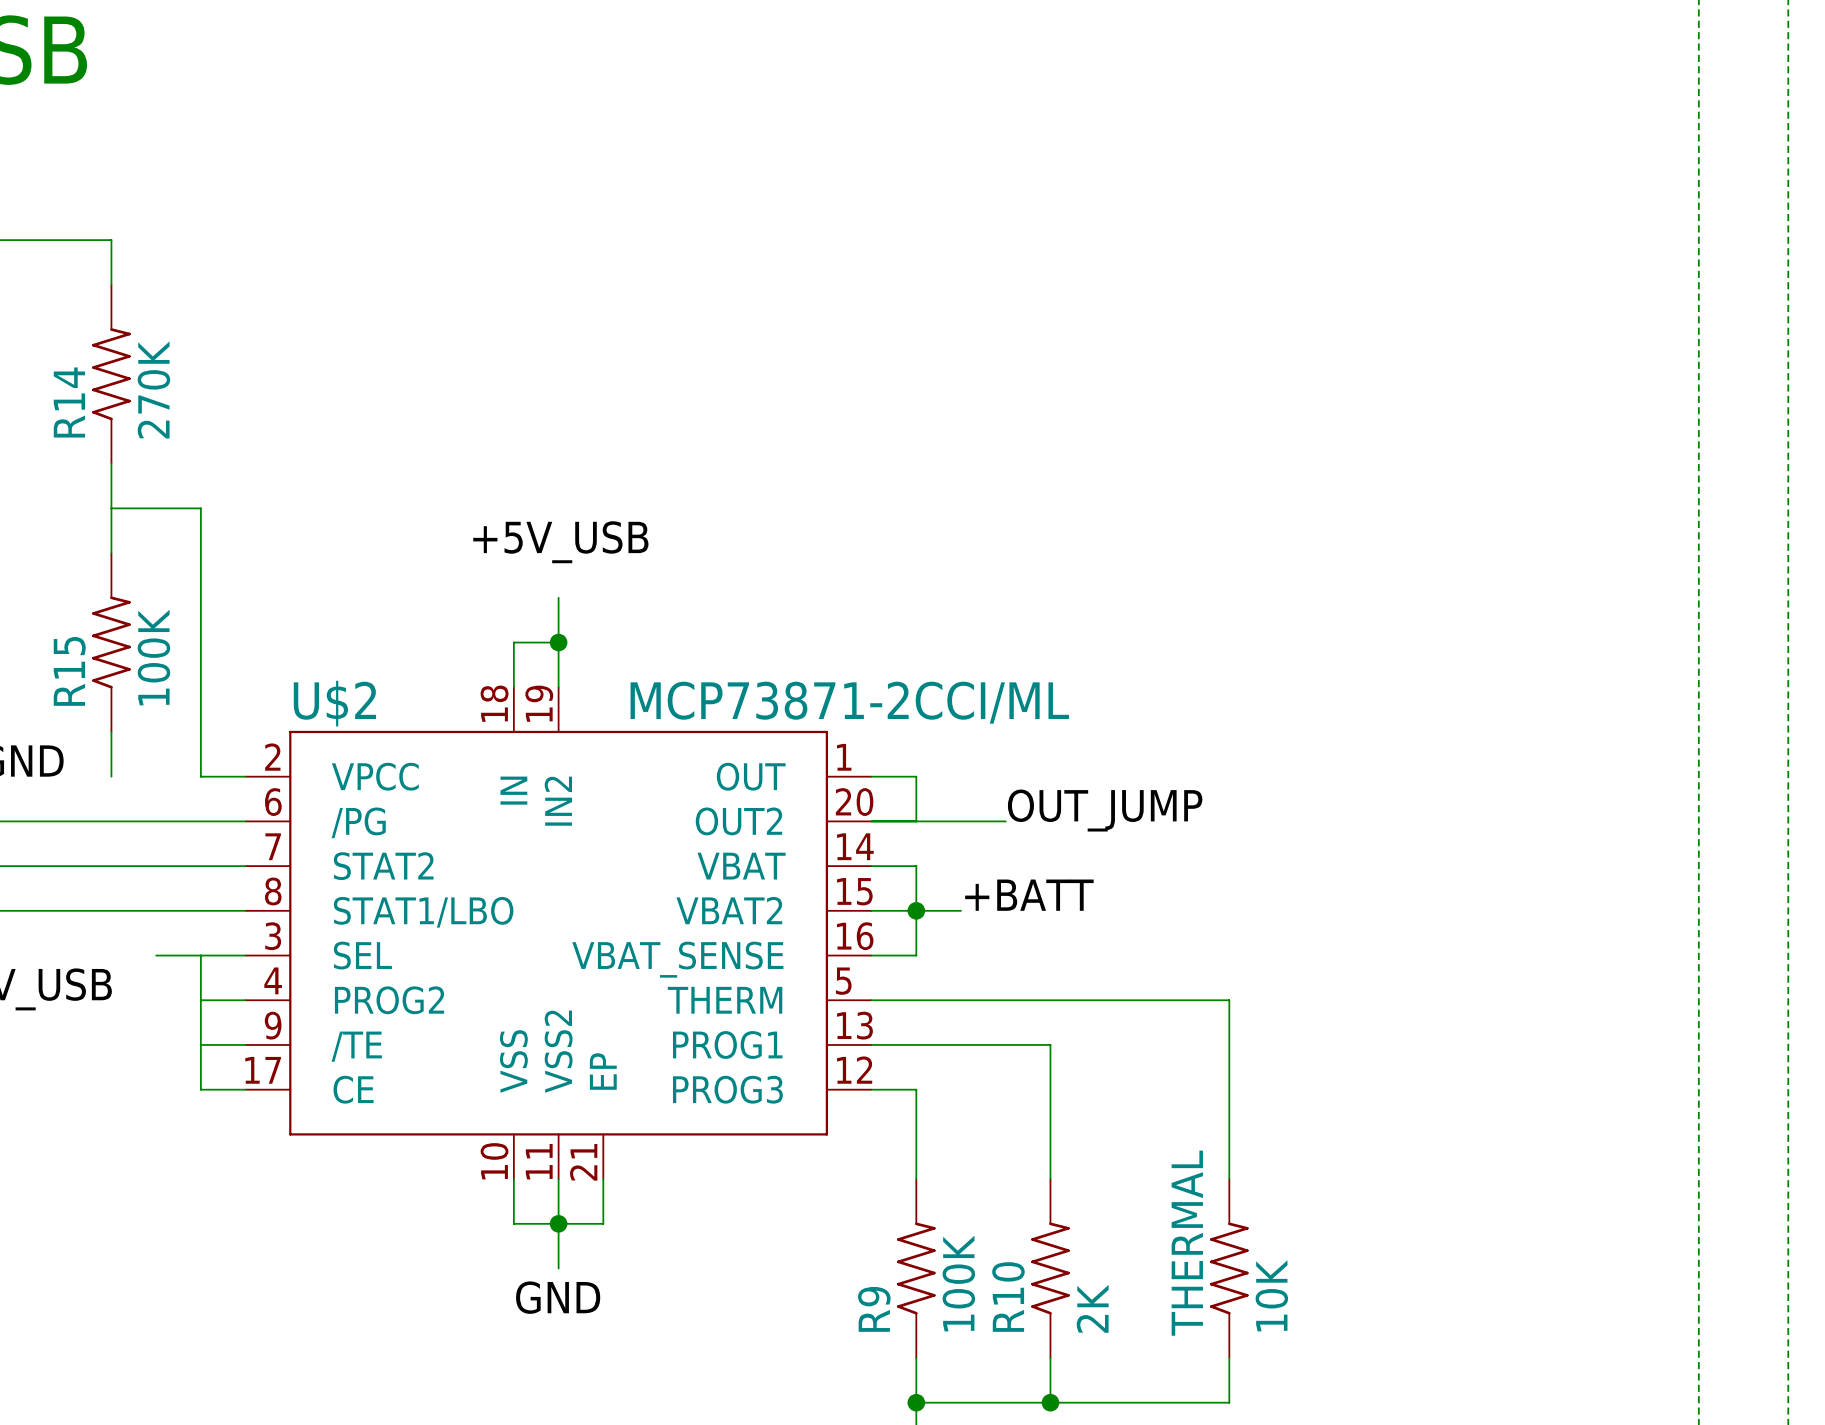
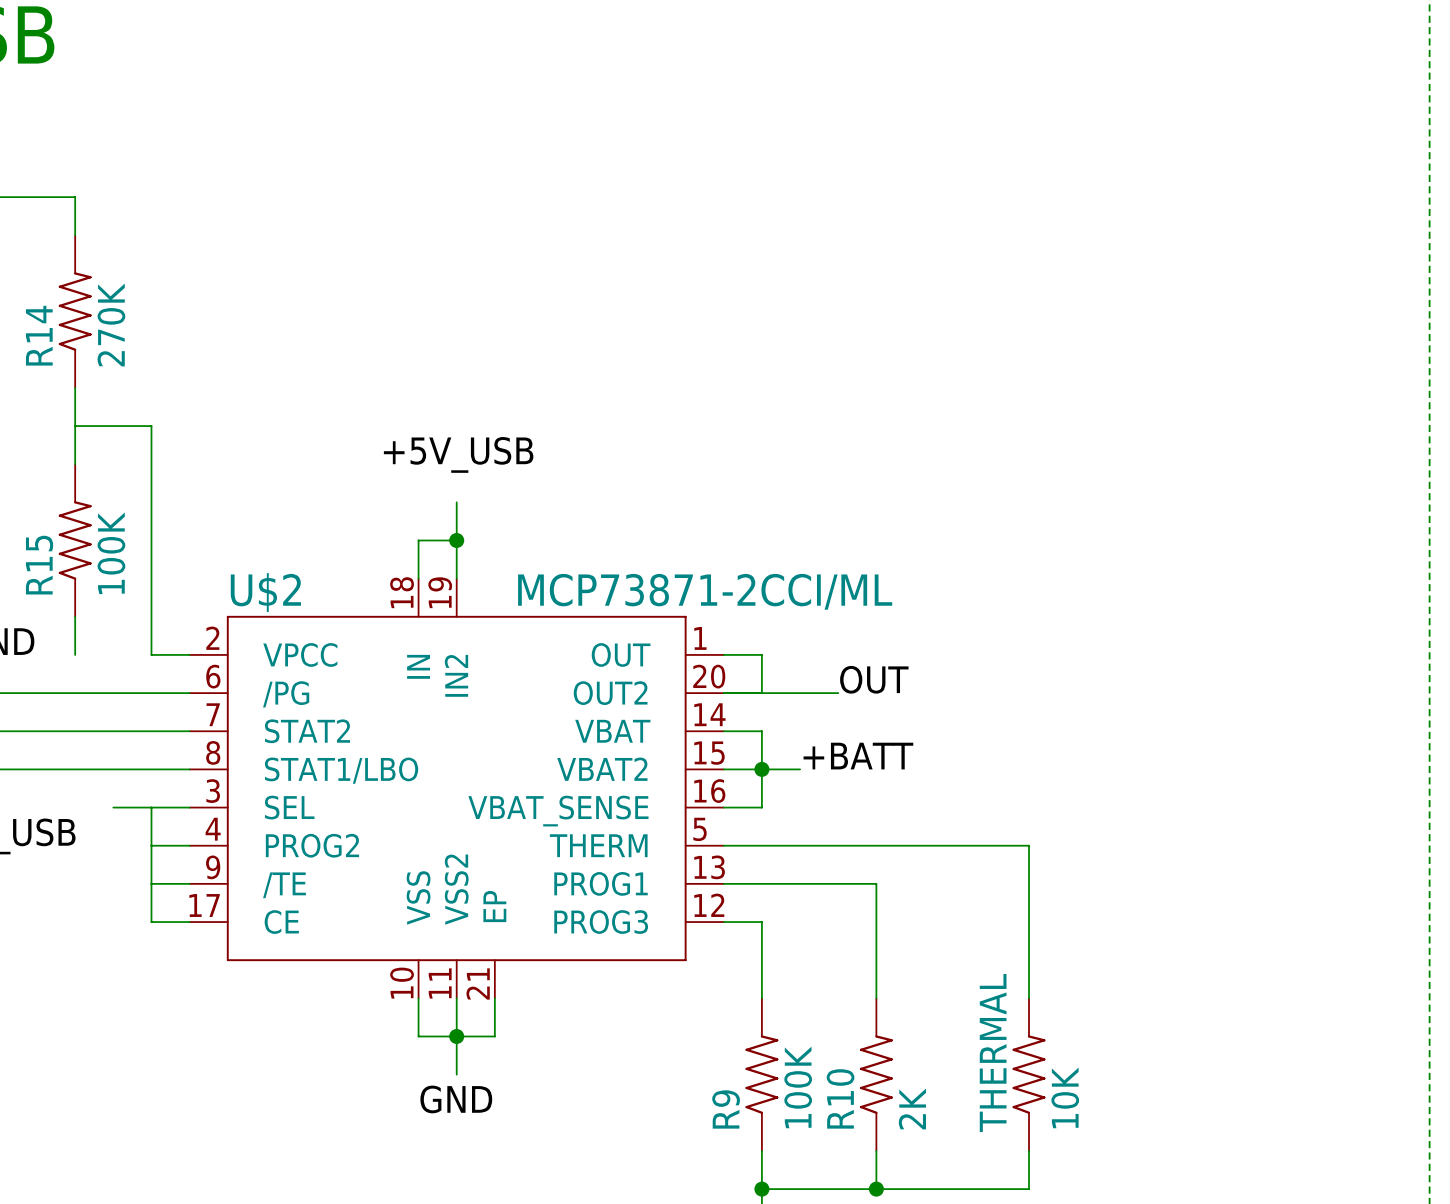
label: OUT_JUMP (1105, 810) -> OUT (874, 679)

